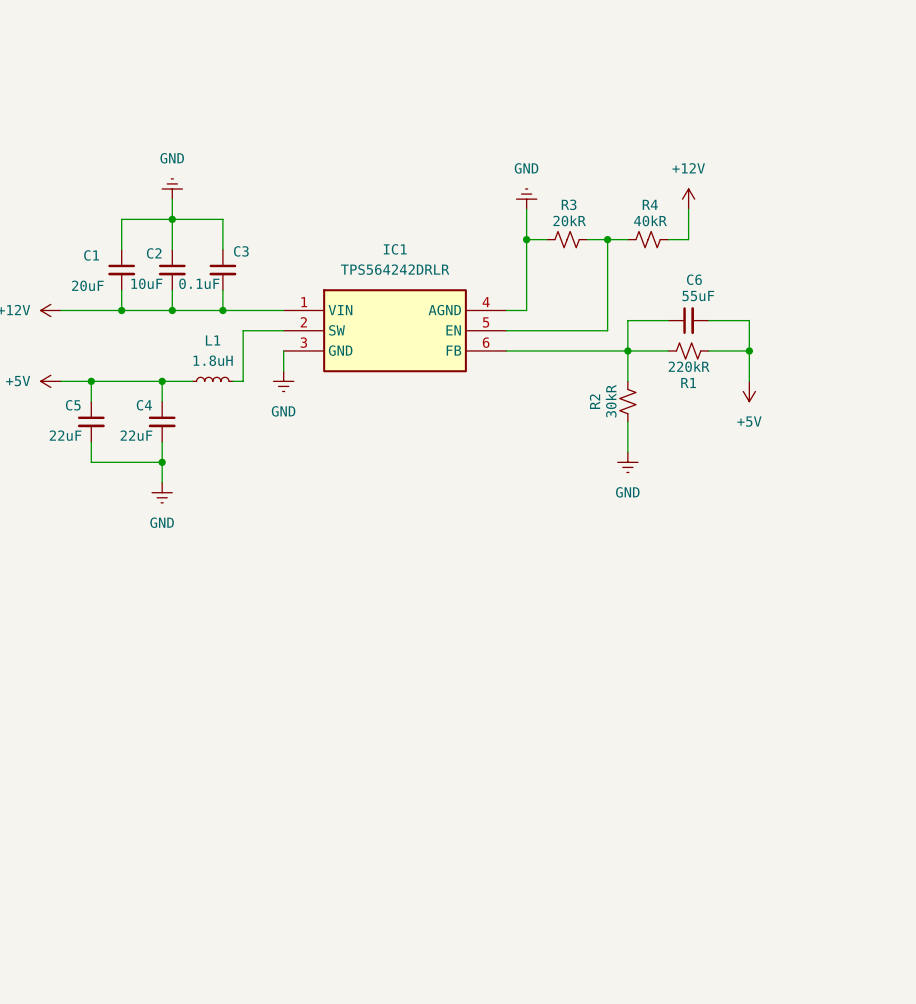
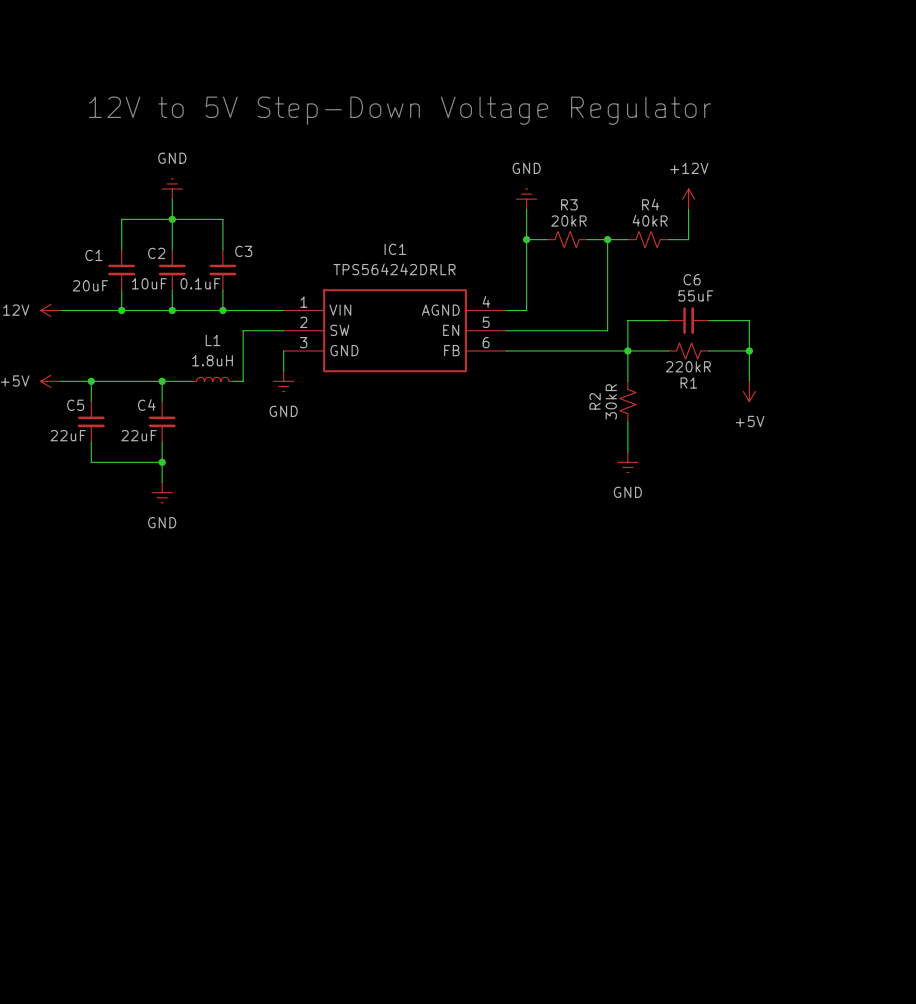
text: none -> 12V to 5V Step-Down Voltage Regulator (400, 110)

